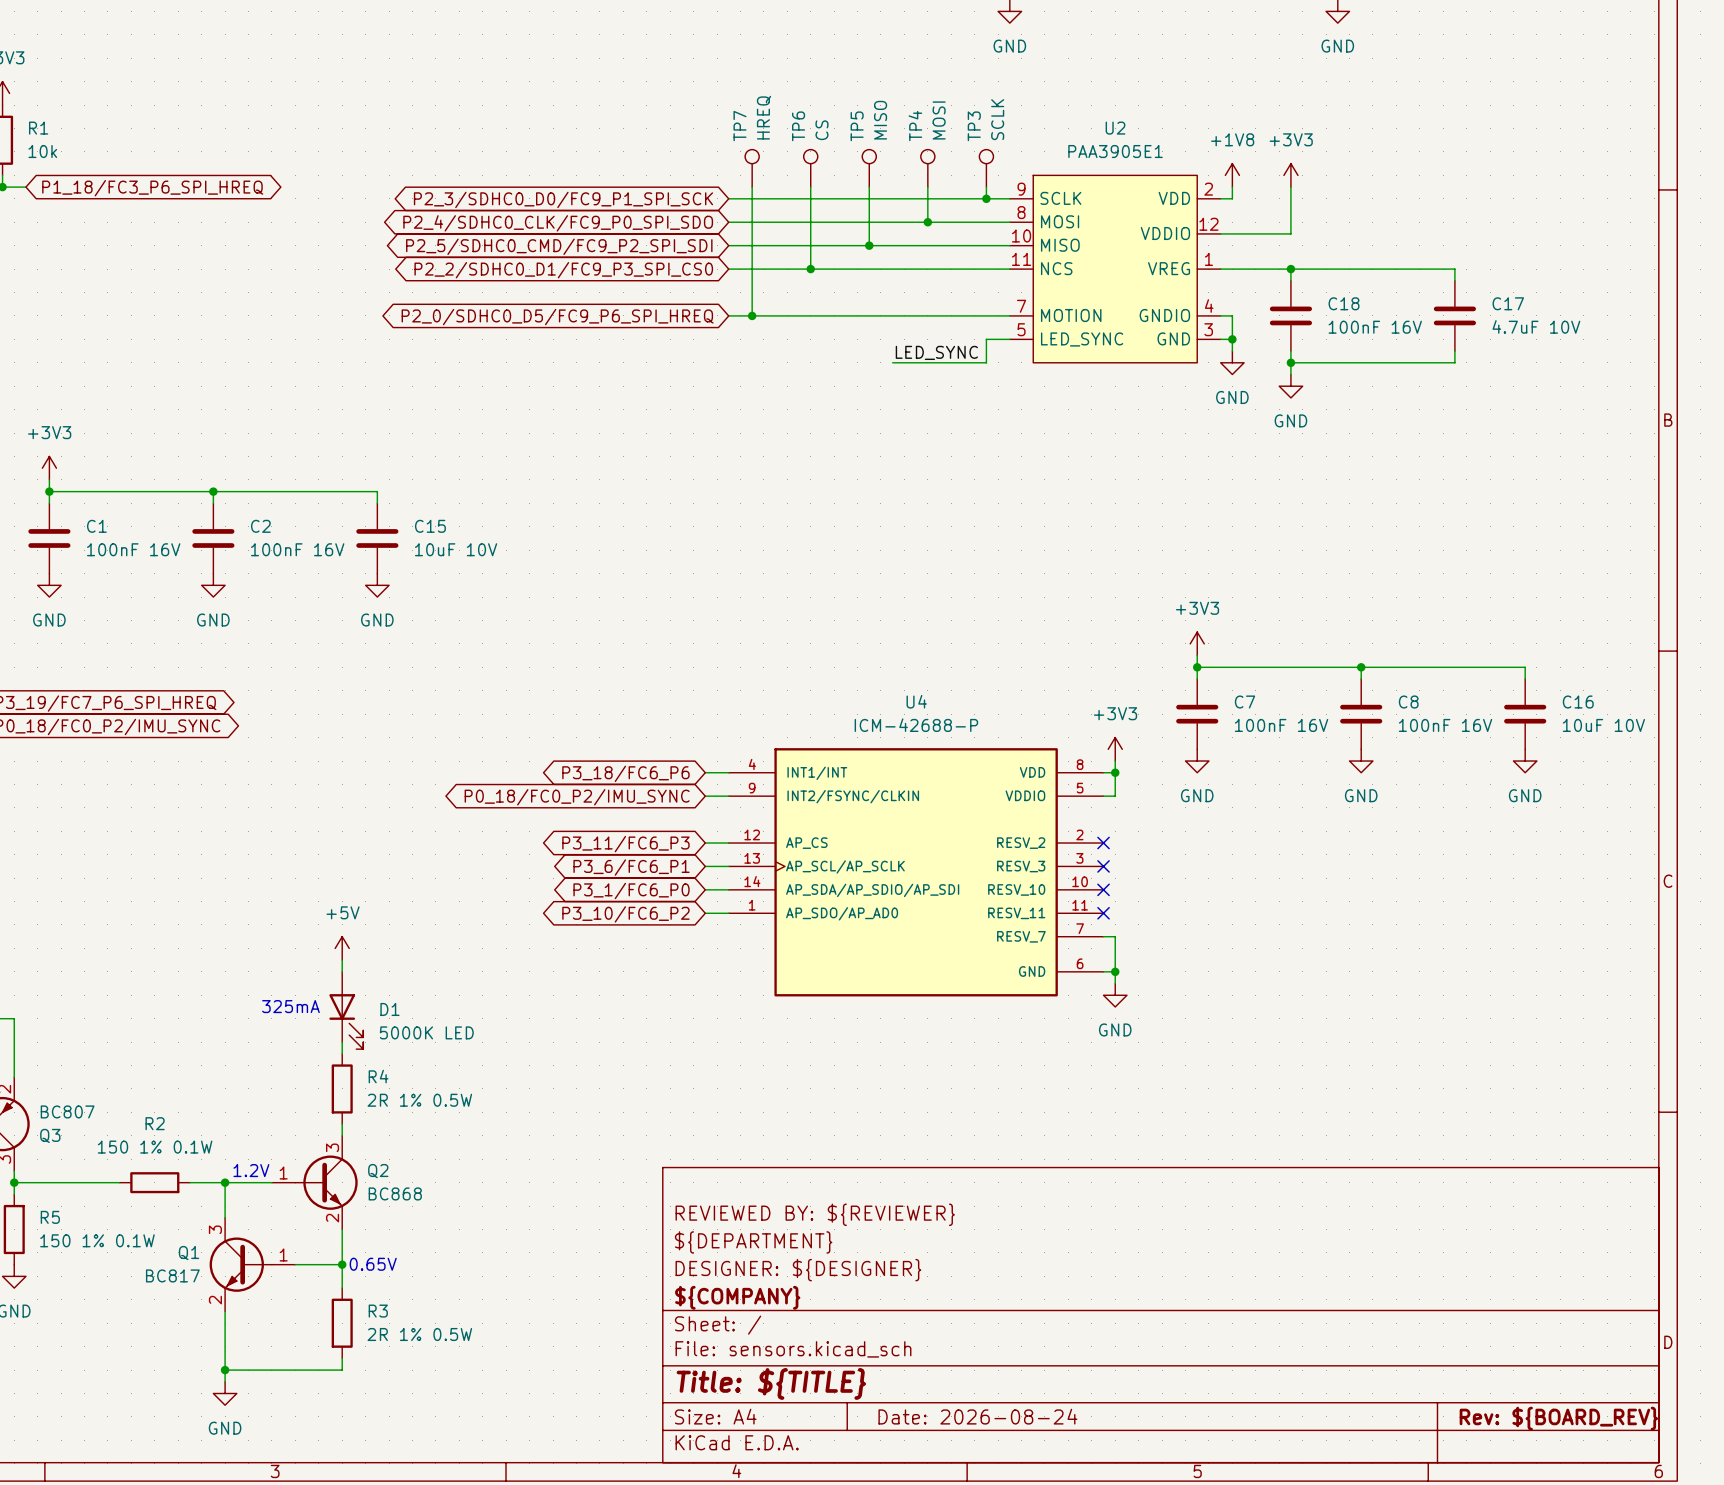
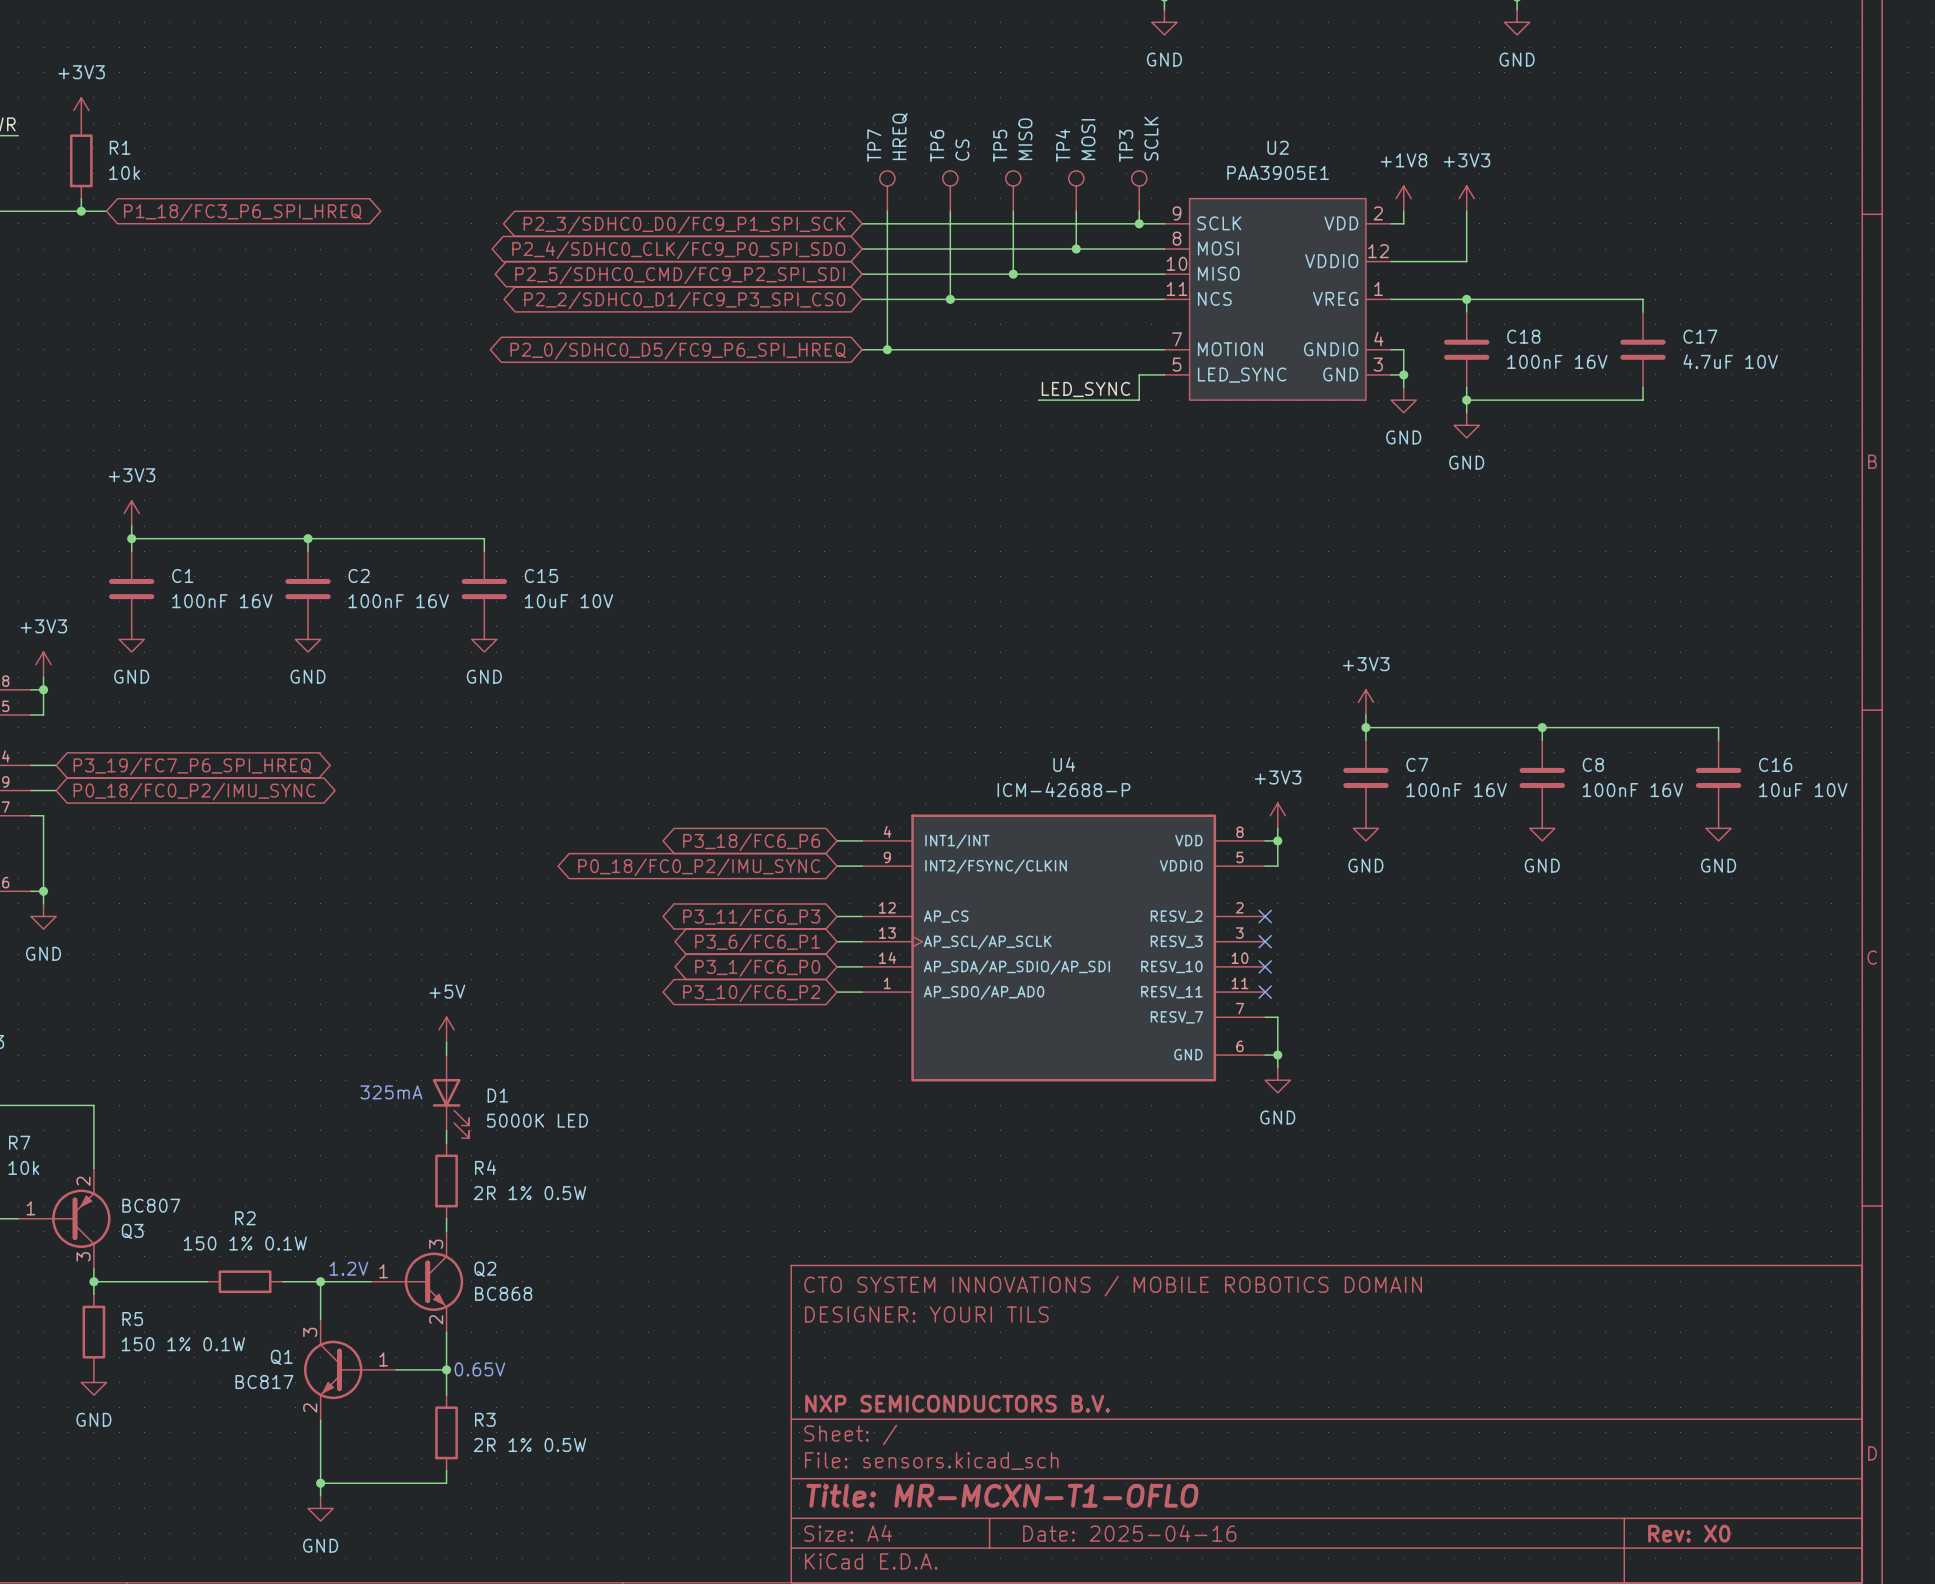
title block: none -> CTO SYSTEM INNOVATIONS / MOBILE ROBOTICS DOMAIN (1113, 1286)
title block: REVIEWED BY: ${REVIEWER} (815, 1214) -> DESIGNER: YOURI TILS (926, 1314)
title block: ${DEPARTMENT} (753, 1242) -> none
title block: DESIGNER: ${DESIGNER} (798, 1270) -> none
title block: ${COMPANY} (737, 1297) -> NXP SEMICONDUCTORS B.V. (957, 1403)
title block: Title: ${TITLE} (771, 1383) -> Title: MR-MCXN-T1-OFLO (1002, 1495)
title block: Date: 2026-08-24 (977, 1416) -> Date: 2025-04-16 (1129, 1533)
title block: Rev: ${BOARD_REV} (1558, 1418) -> Rev: X0 (1689, 1533)

